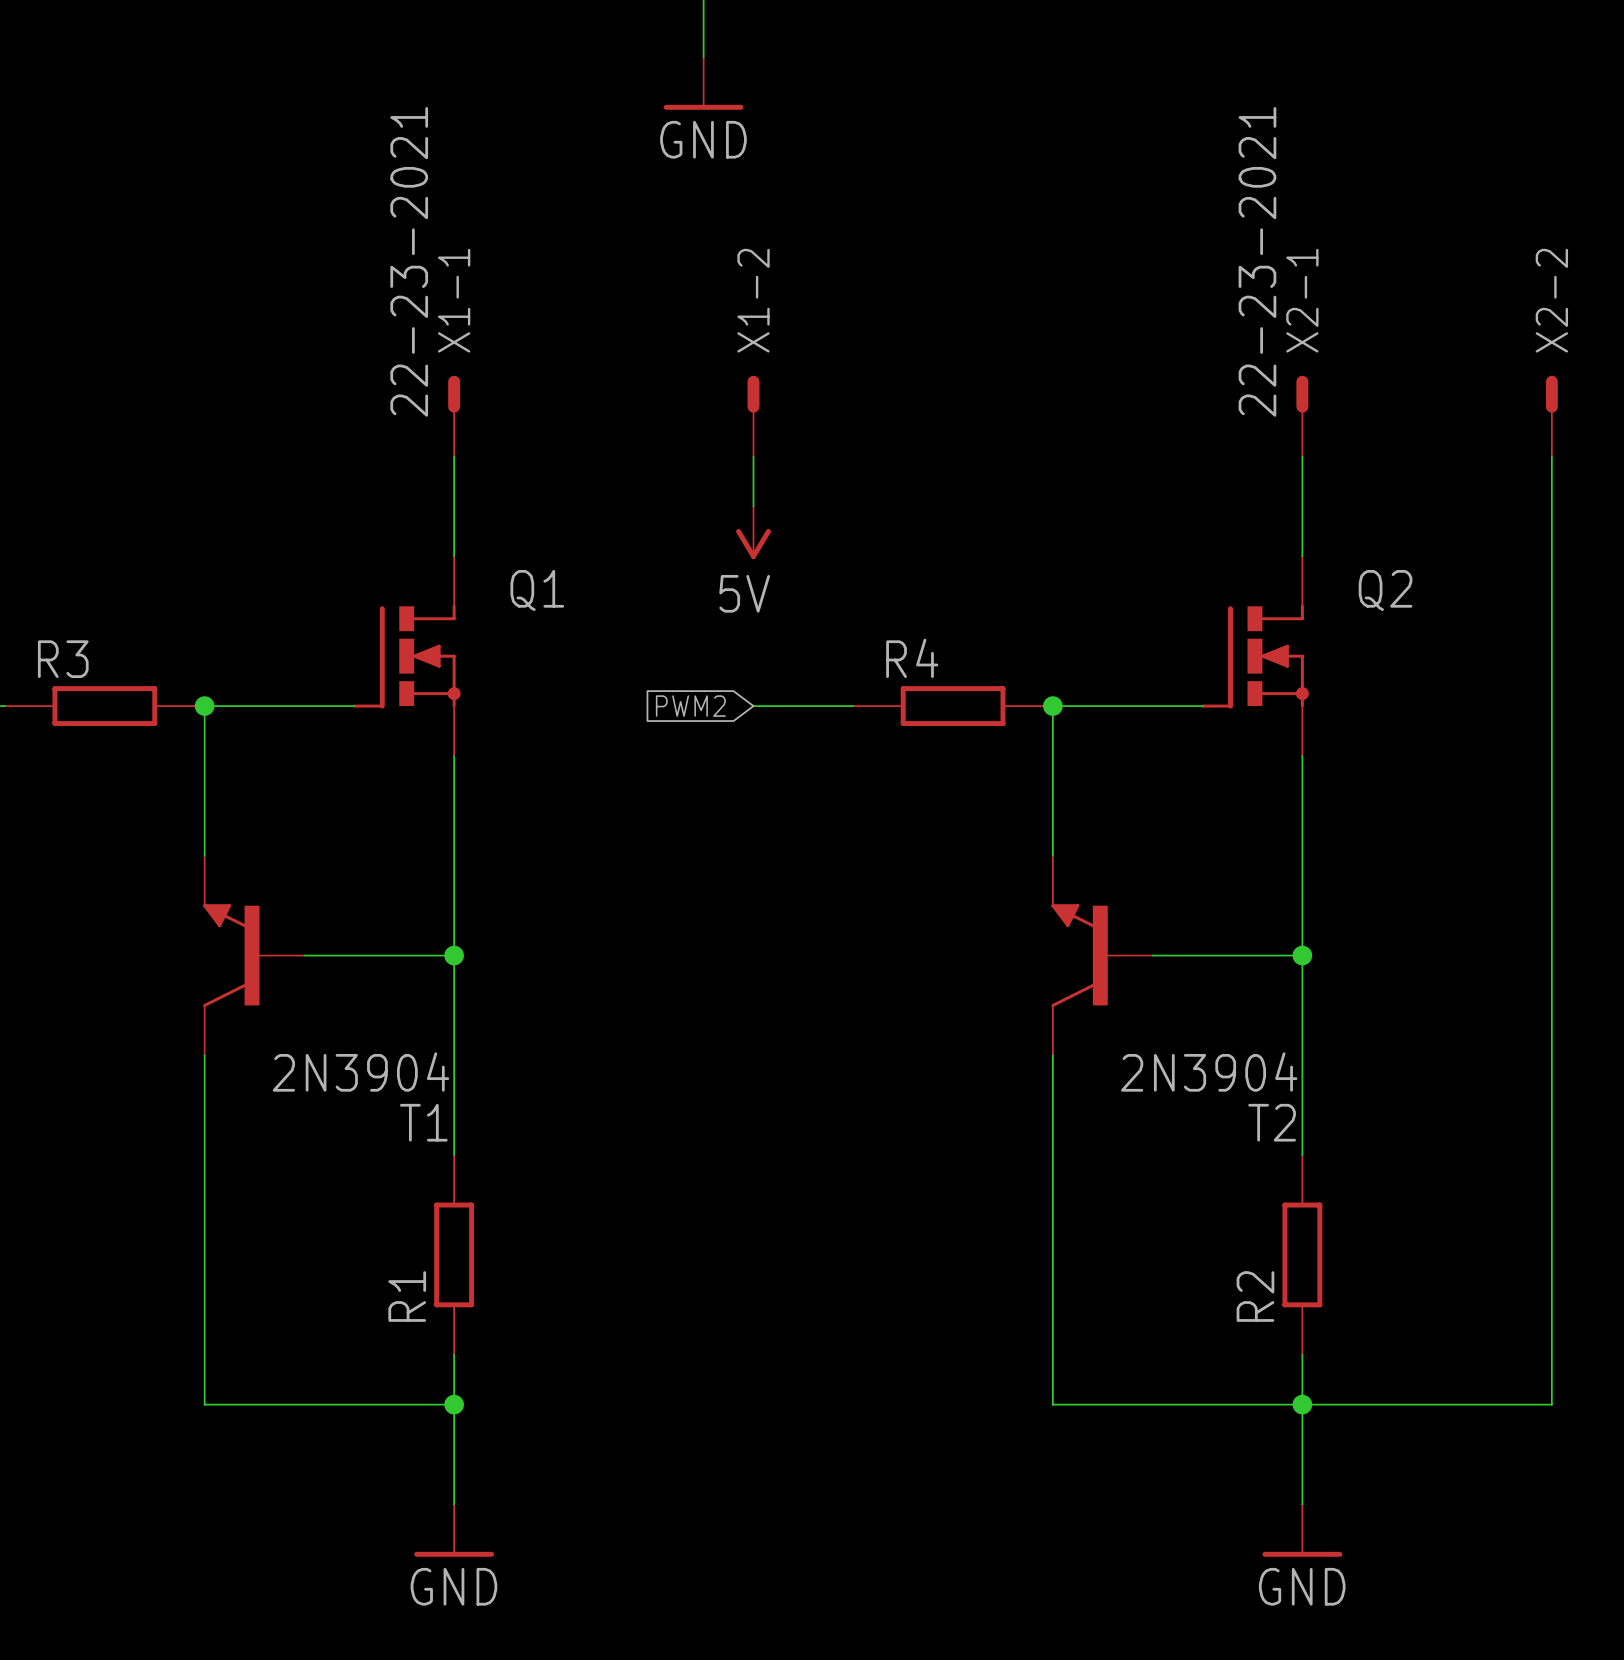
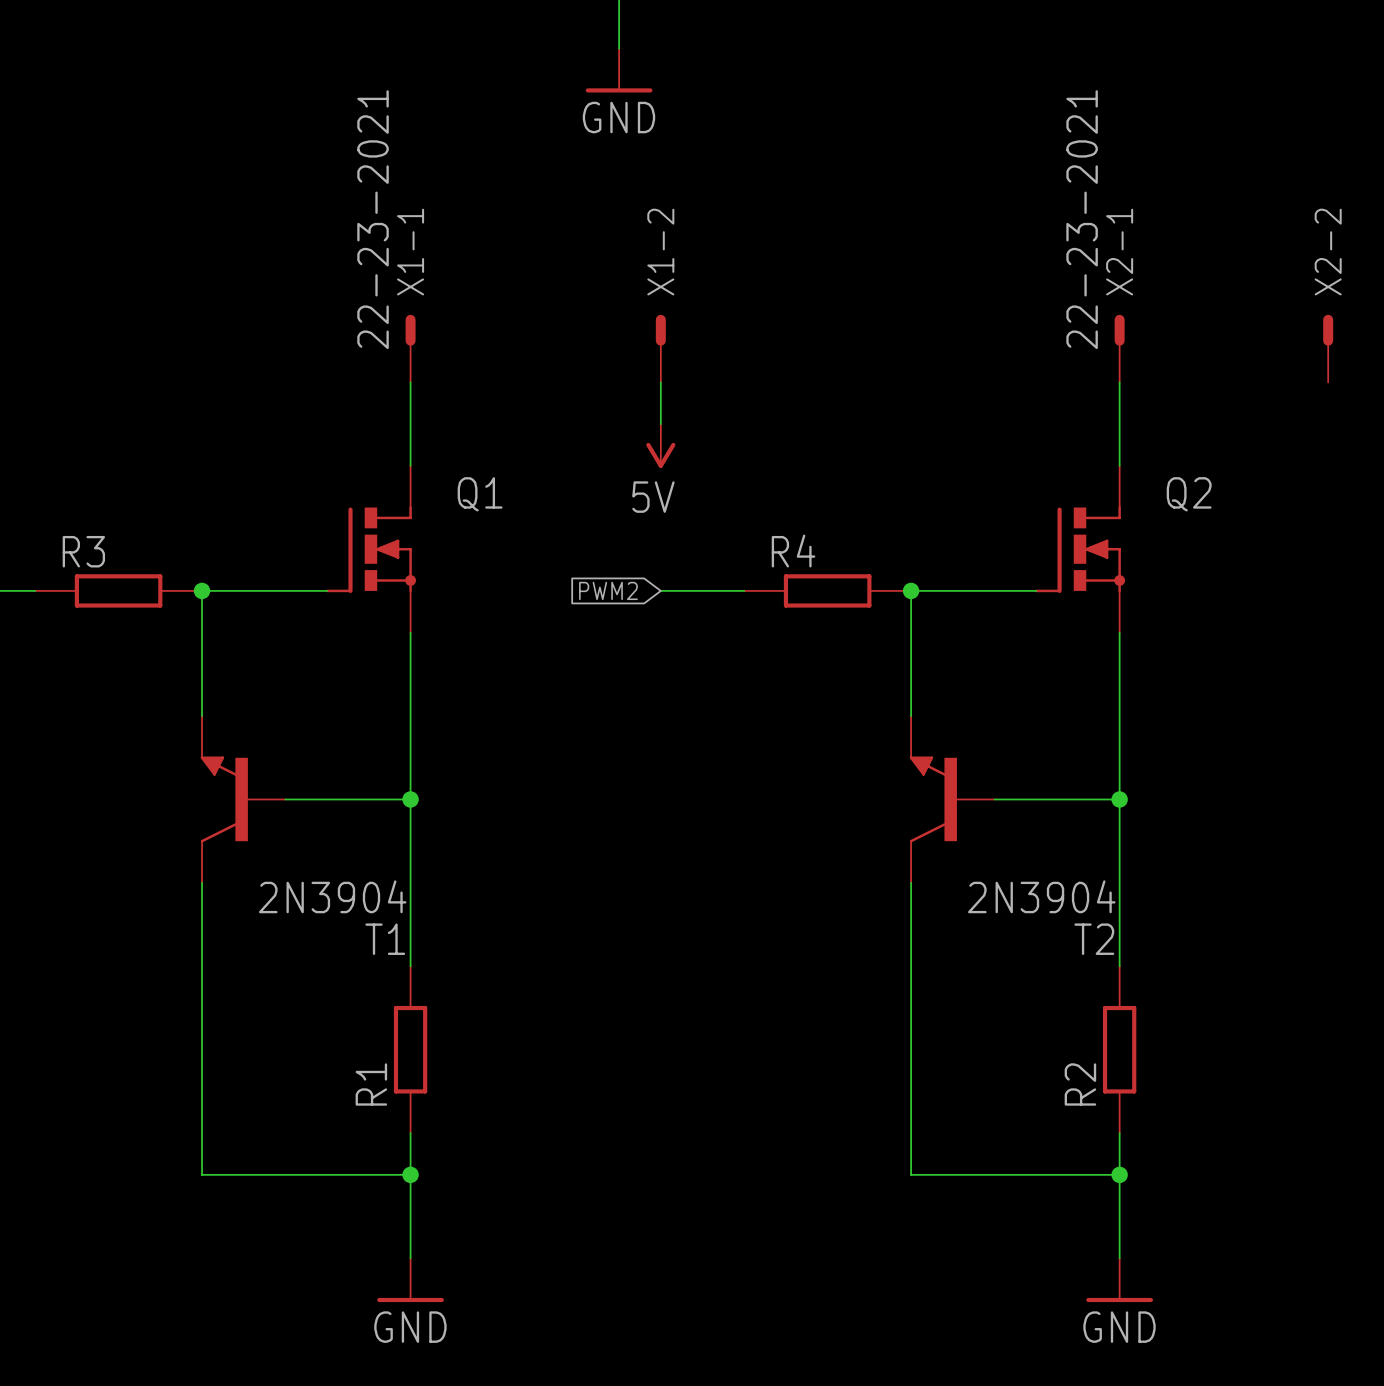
wire: (1551, 456) (1551, 1404) (1302, 1404) -> none

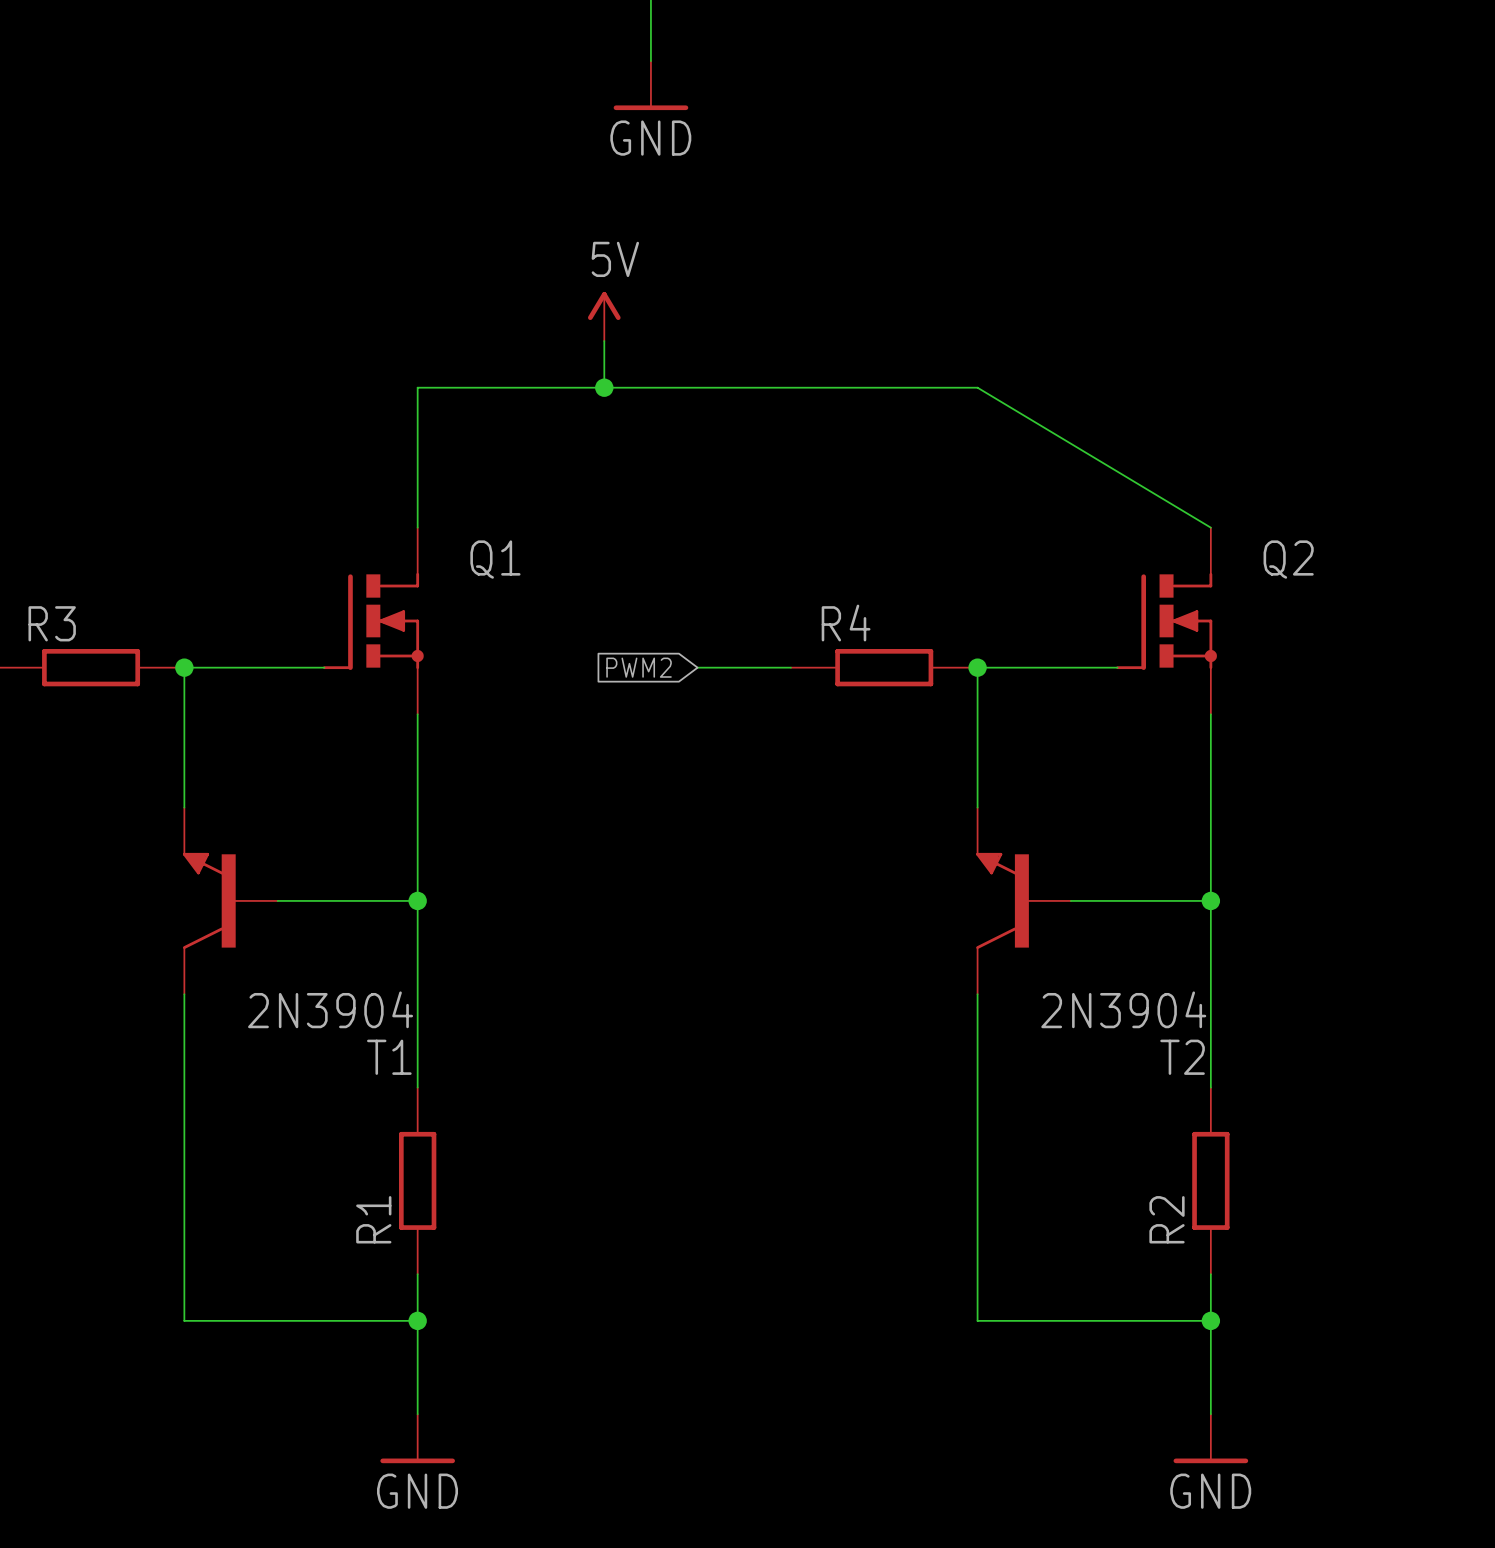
junction: none -> (604, 387)
X1-1: 22-23-2021 (410, 348) -> none
X1-2: (660, 348) -> none
X2-1: 22-23-2021 (1119, 348) -> none
X2-2: (1328, 348) -> none
wire: (660, 382) (660, 424) -> (604, 341) (604, 387)
wire: (1119, 382) (1119, 465) -> (417, 434) (417, 387) (977, 387) (1210, 527)
power symbol position: 5V (660, 445) -> 5V (604, 316)
power symbol rotation: 0° (660, 455) -> 180° (604, 306)

